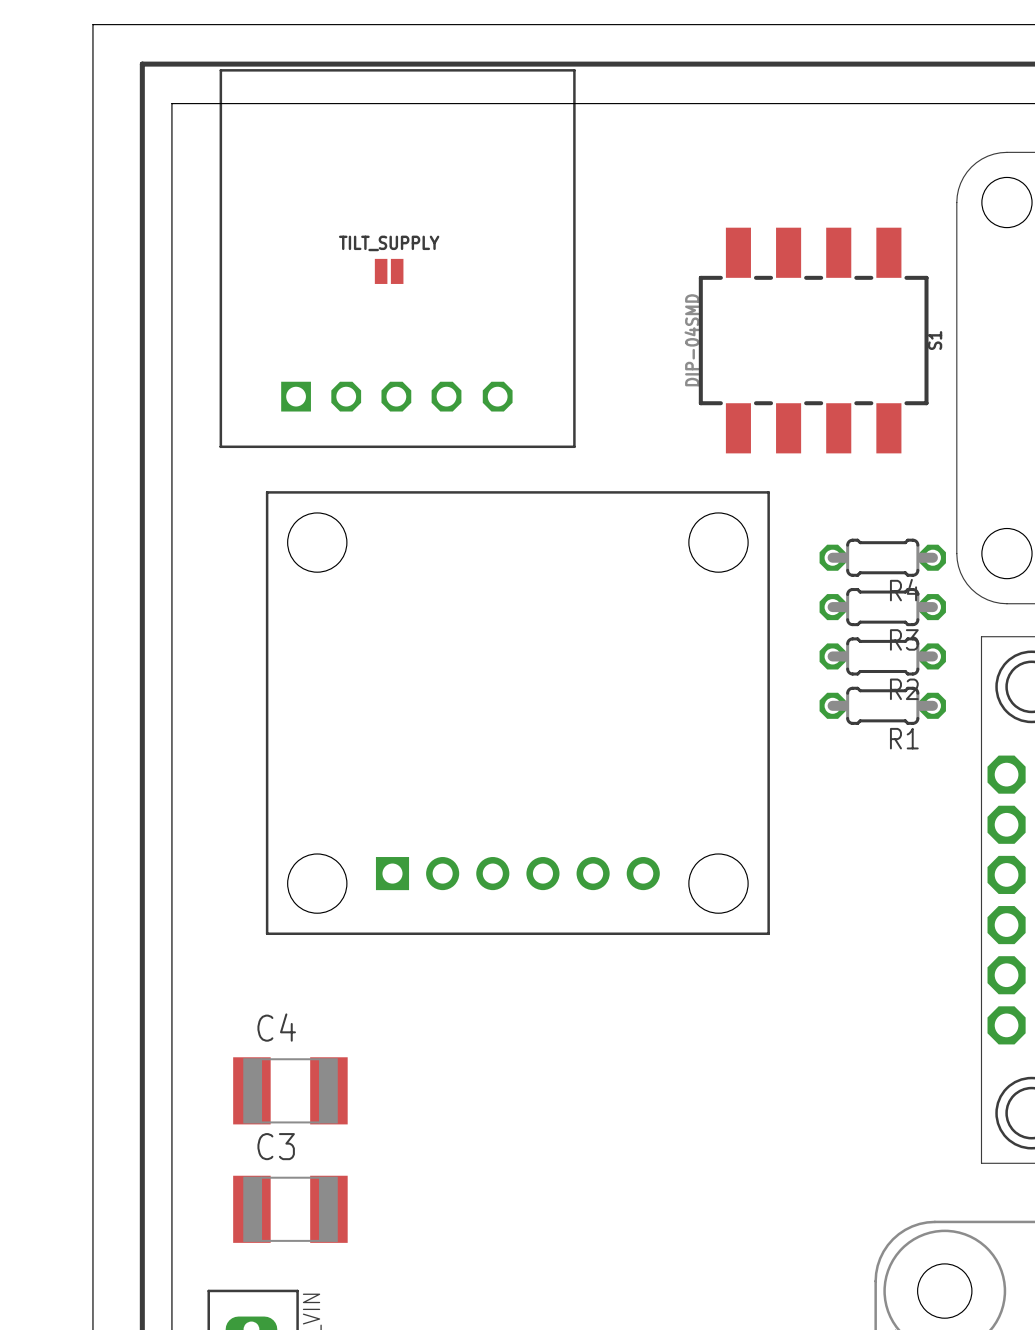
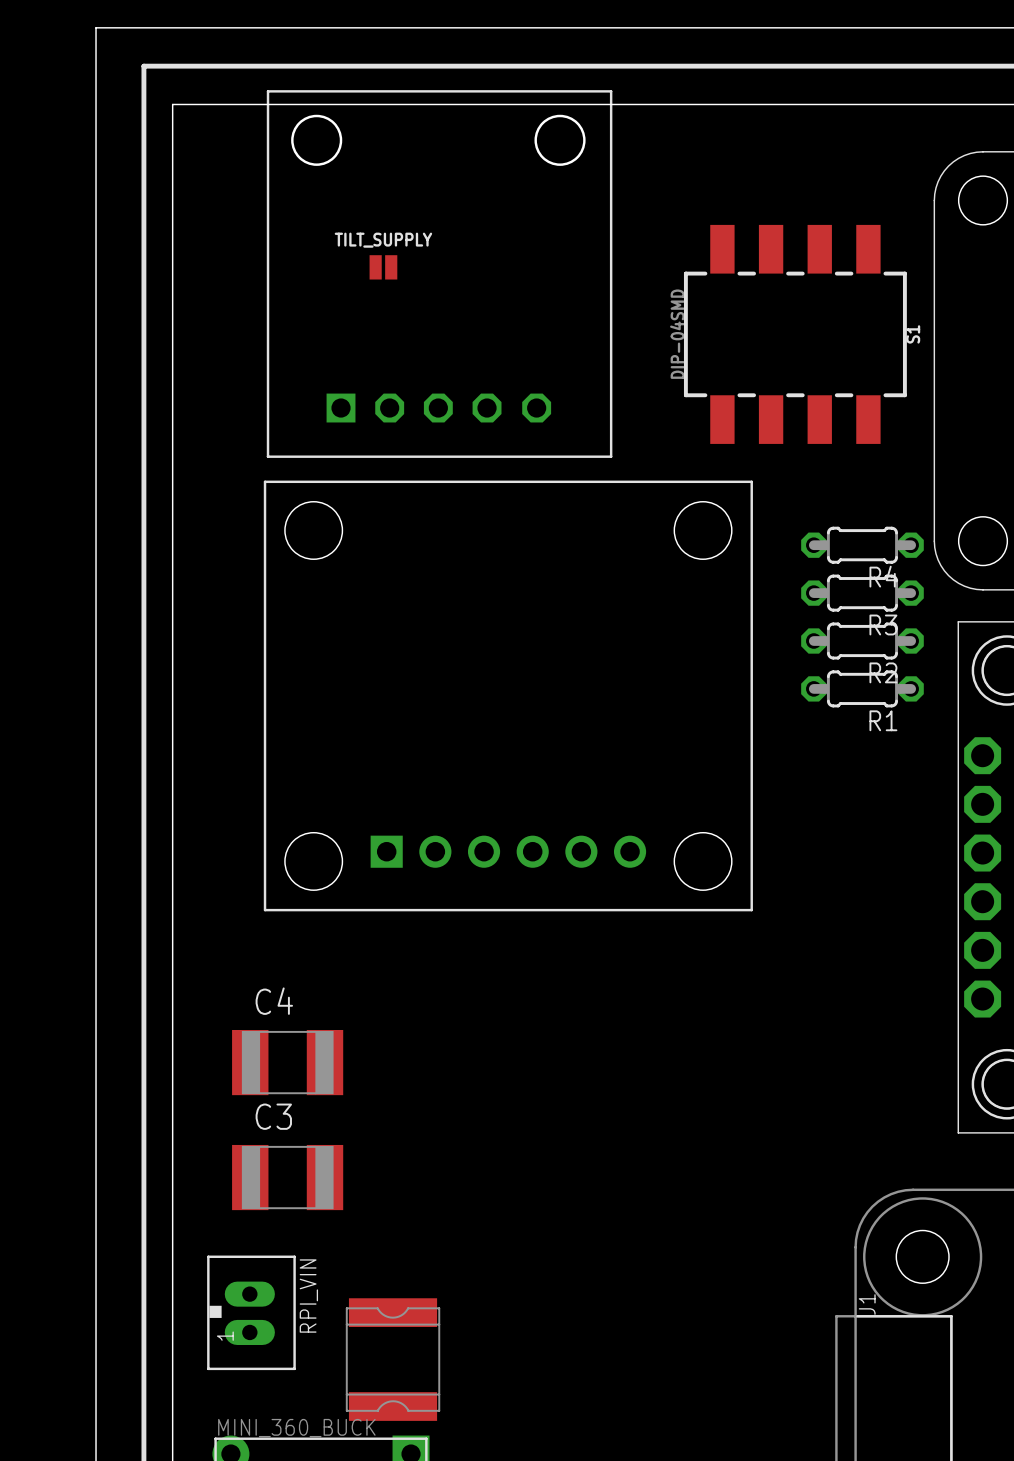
part: (397, 258) -> none
part: none -> (439, 274)

